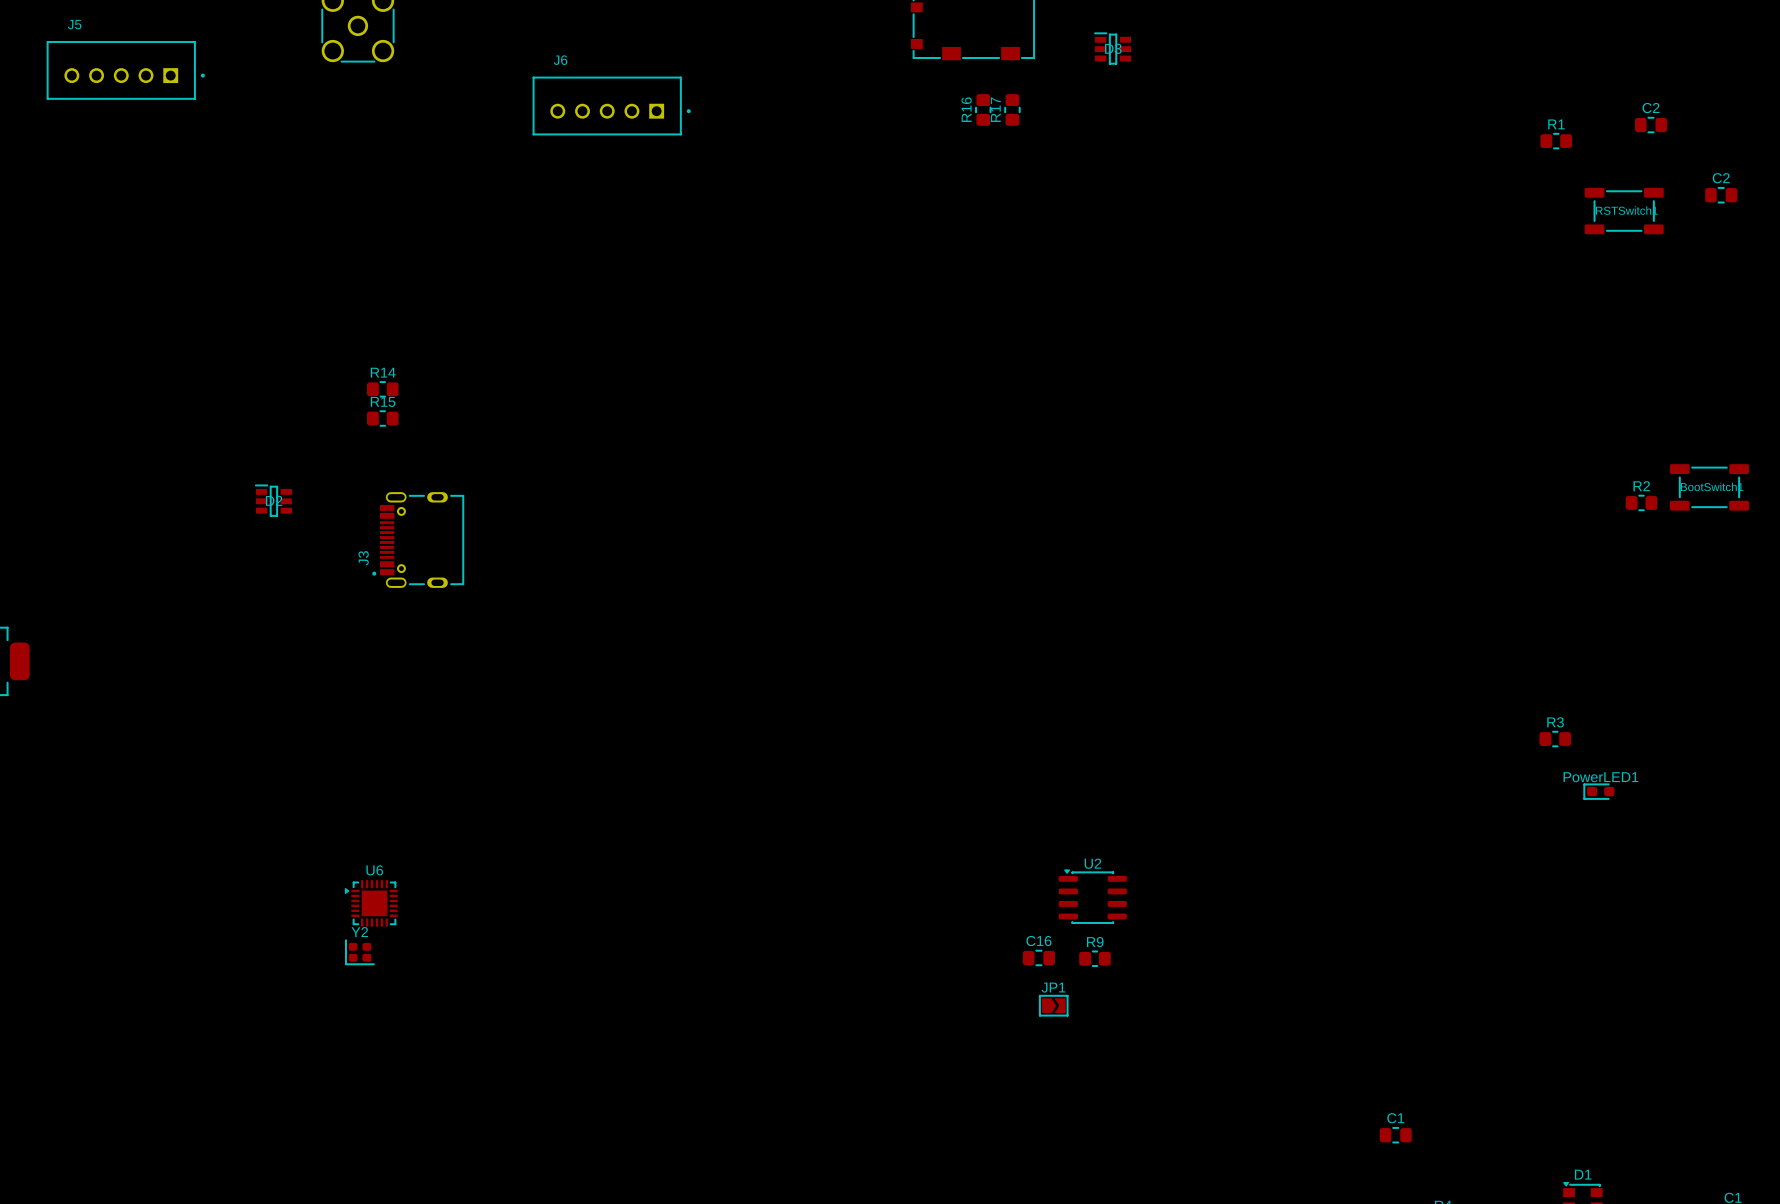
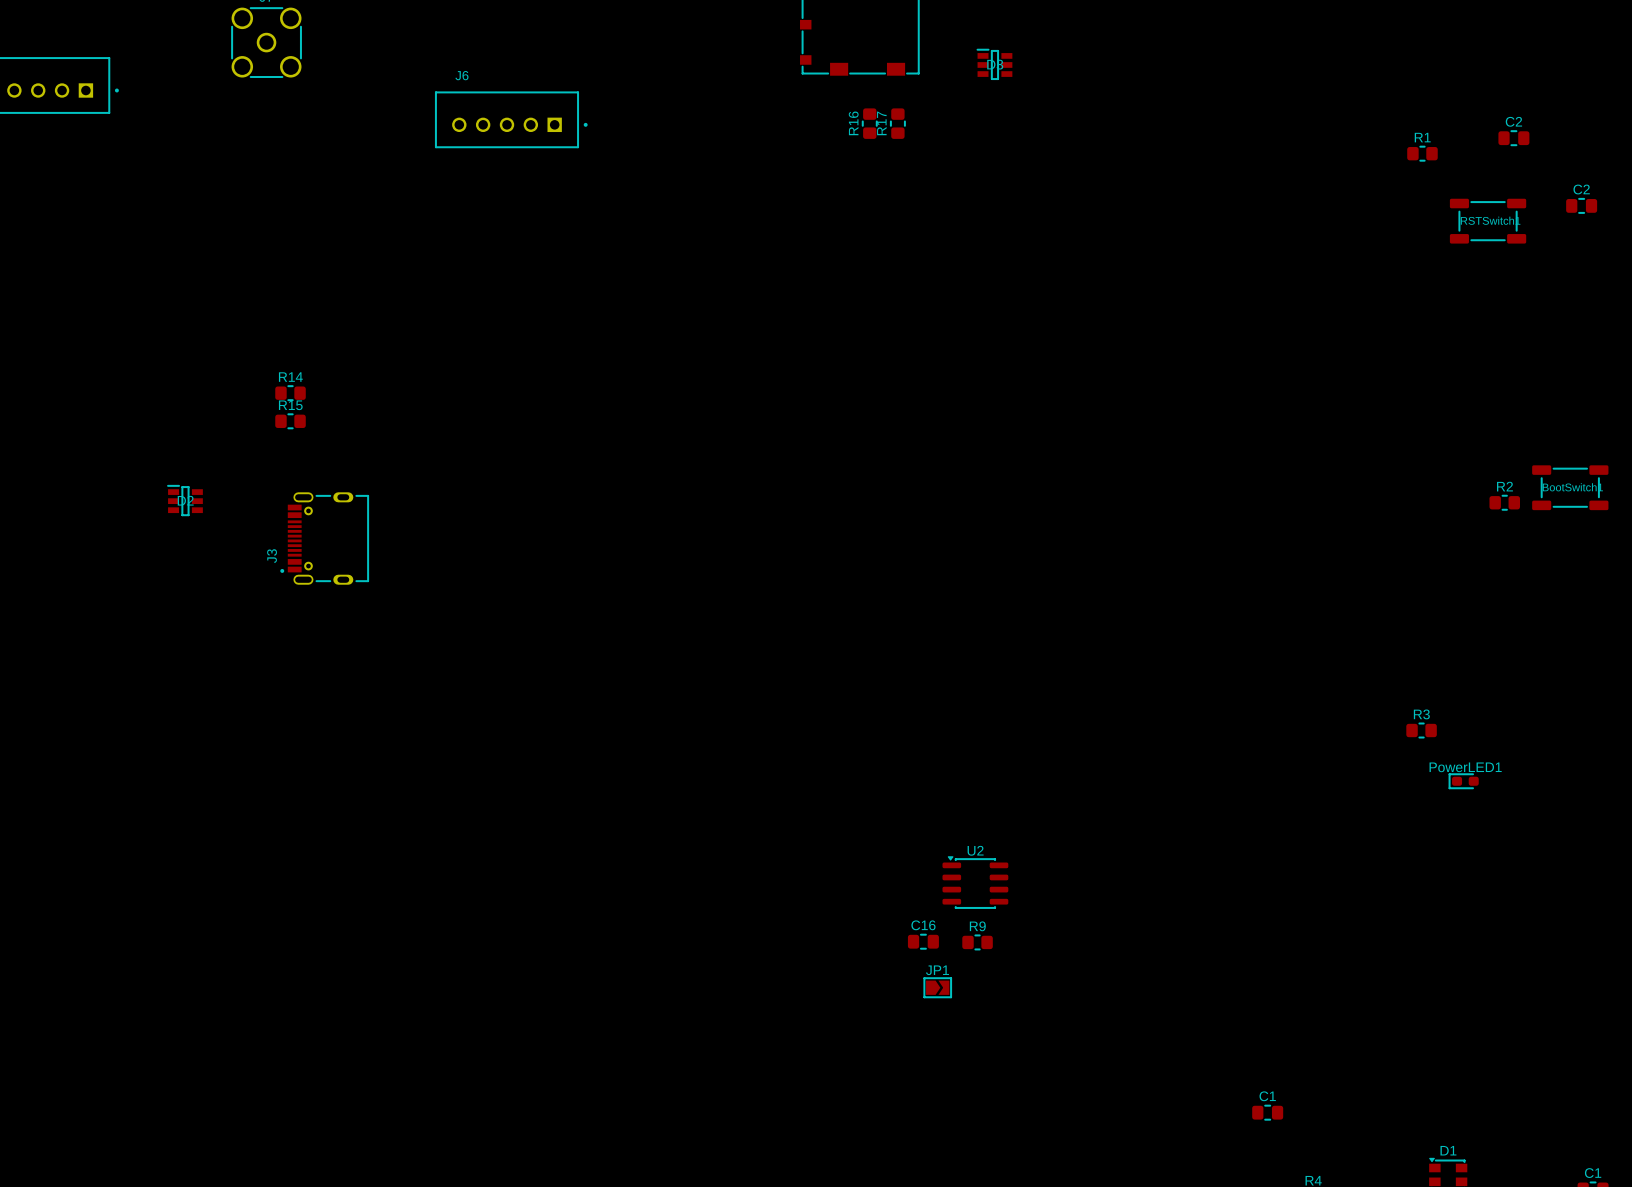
U6: (371, 903) -> none
Y2: (359, 952) -> none

